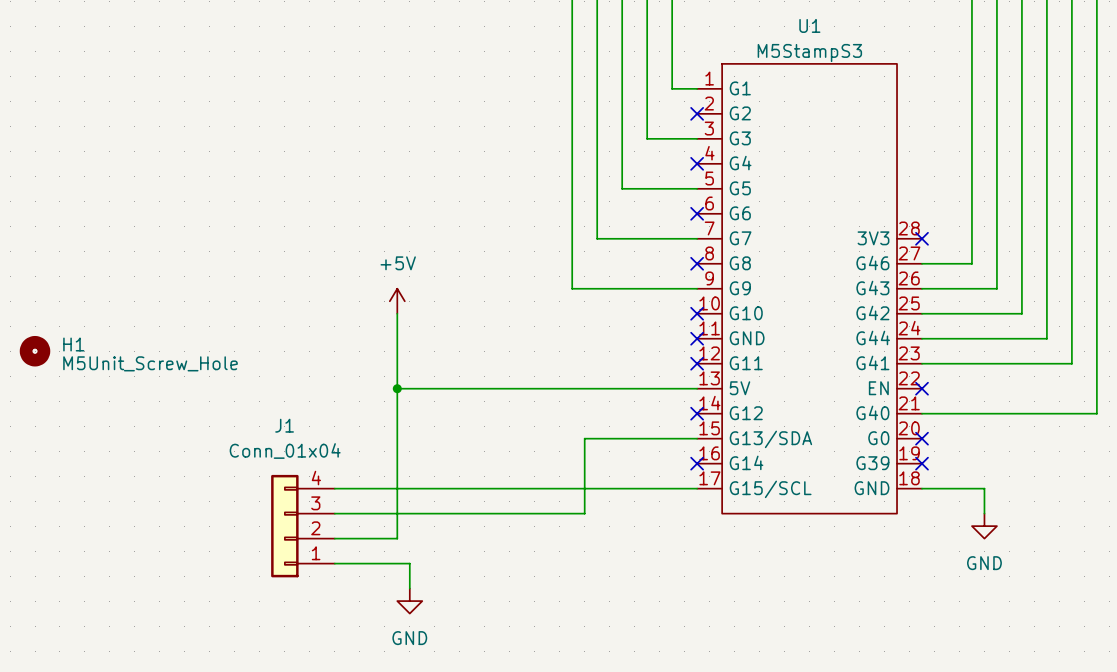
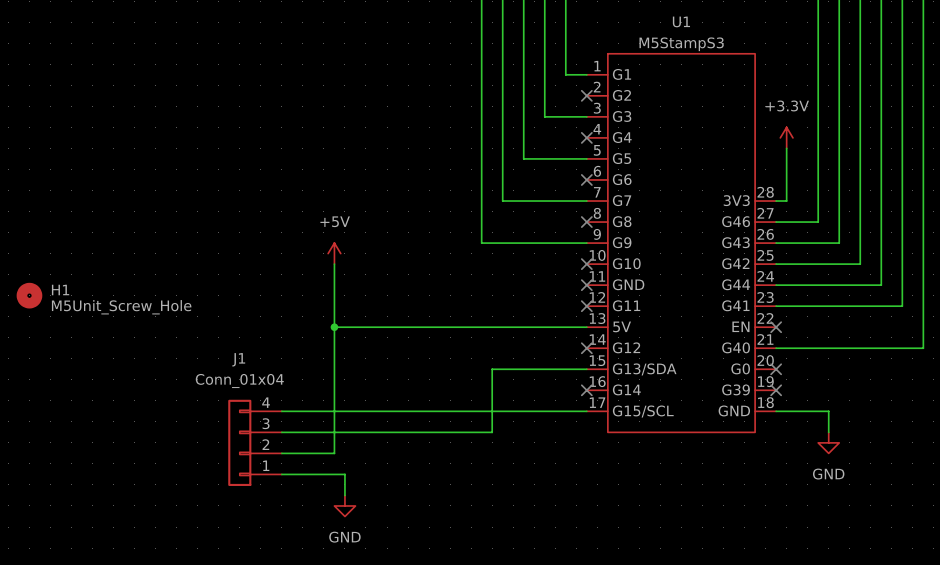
power symbol: none -> +3.3V (786, 137)
wire: none -> (786, 148) (786, 201) (776, 201)
no-connect mark: (922, 238) -> none

